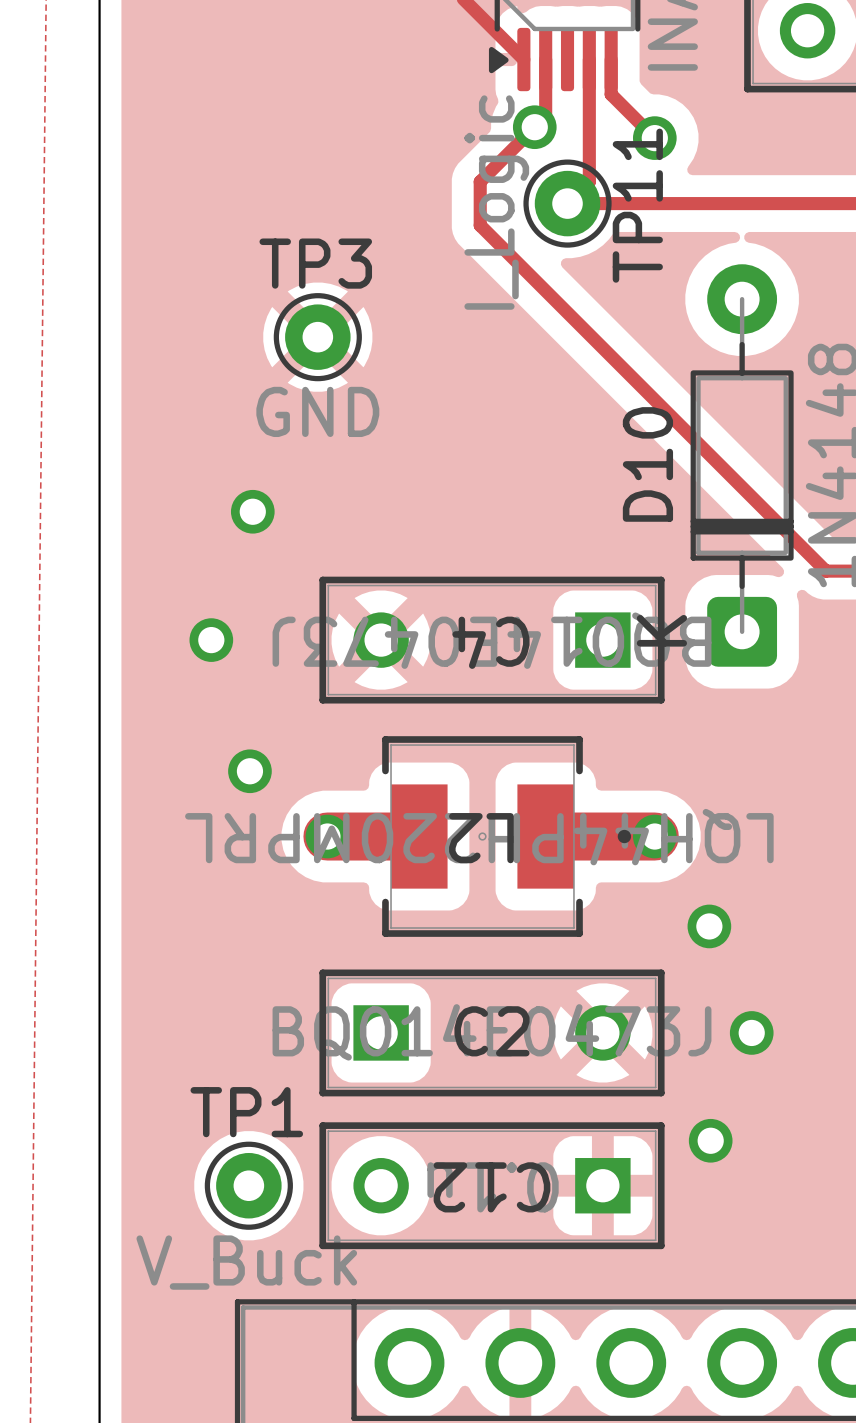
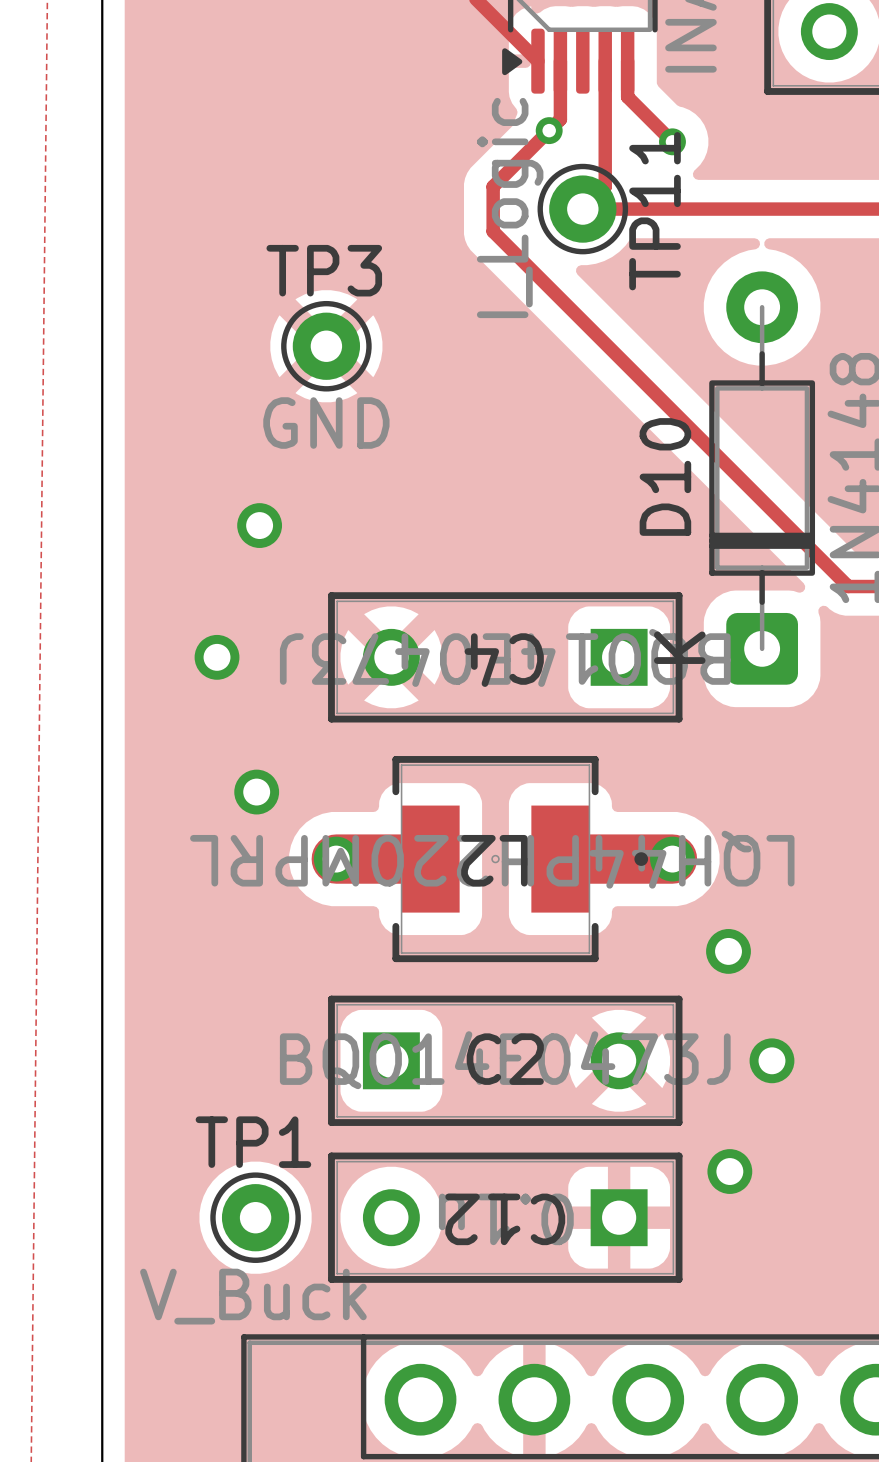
via size: [512, 105, 557, 150] -> [535, 117, 563, 145]
via size: [632, 116, 677, 160] -> [659, 128, 686, 156]

